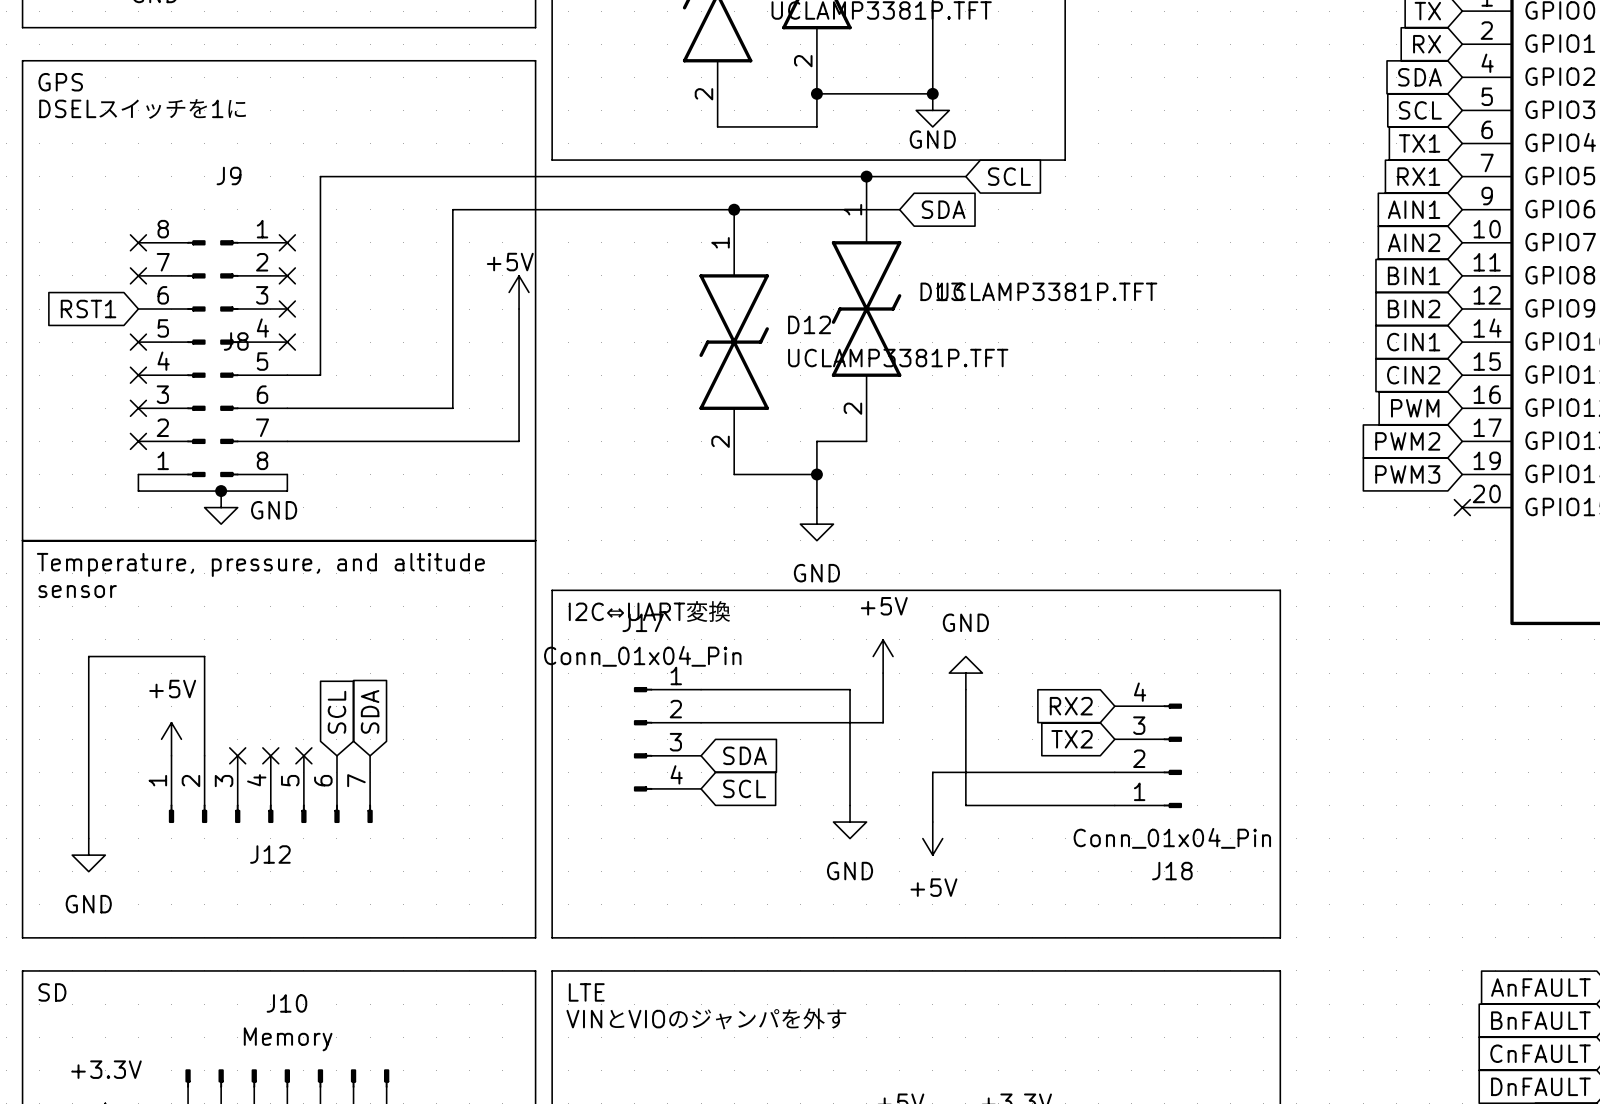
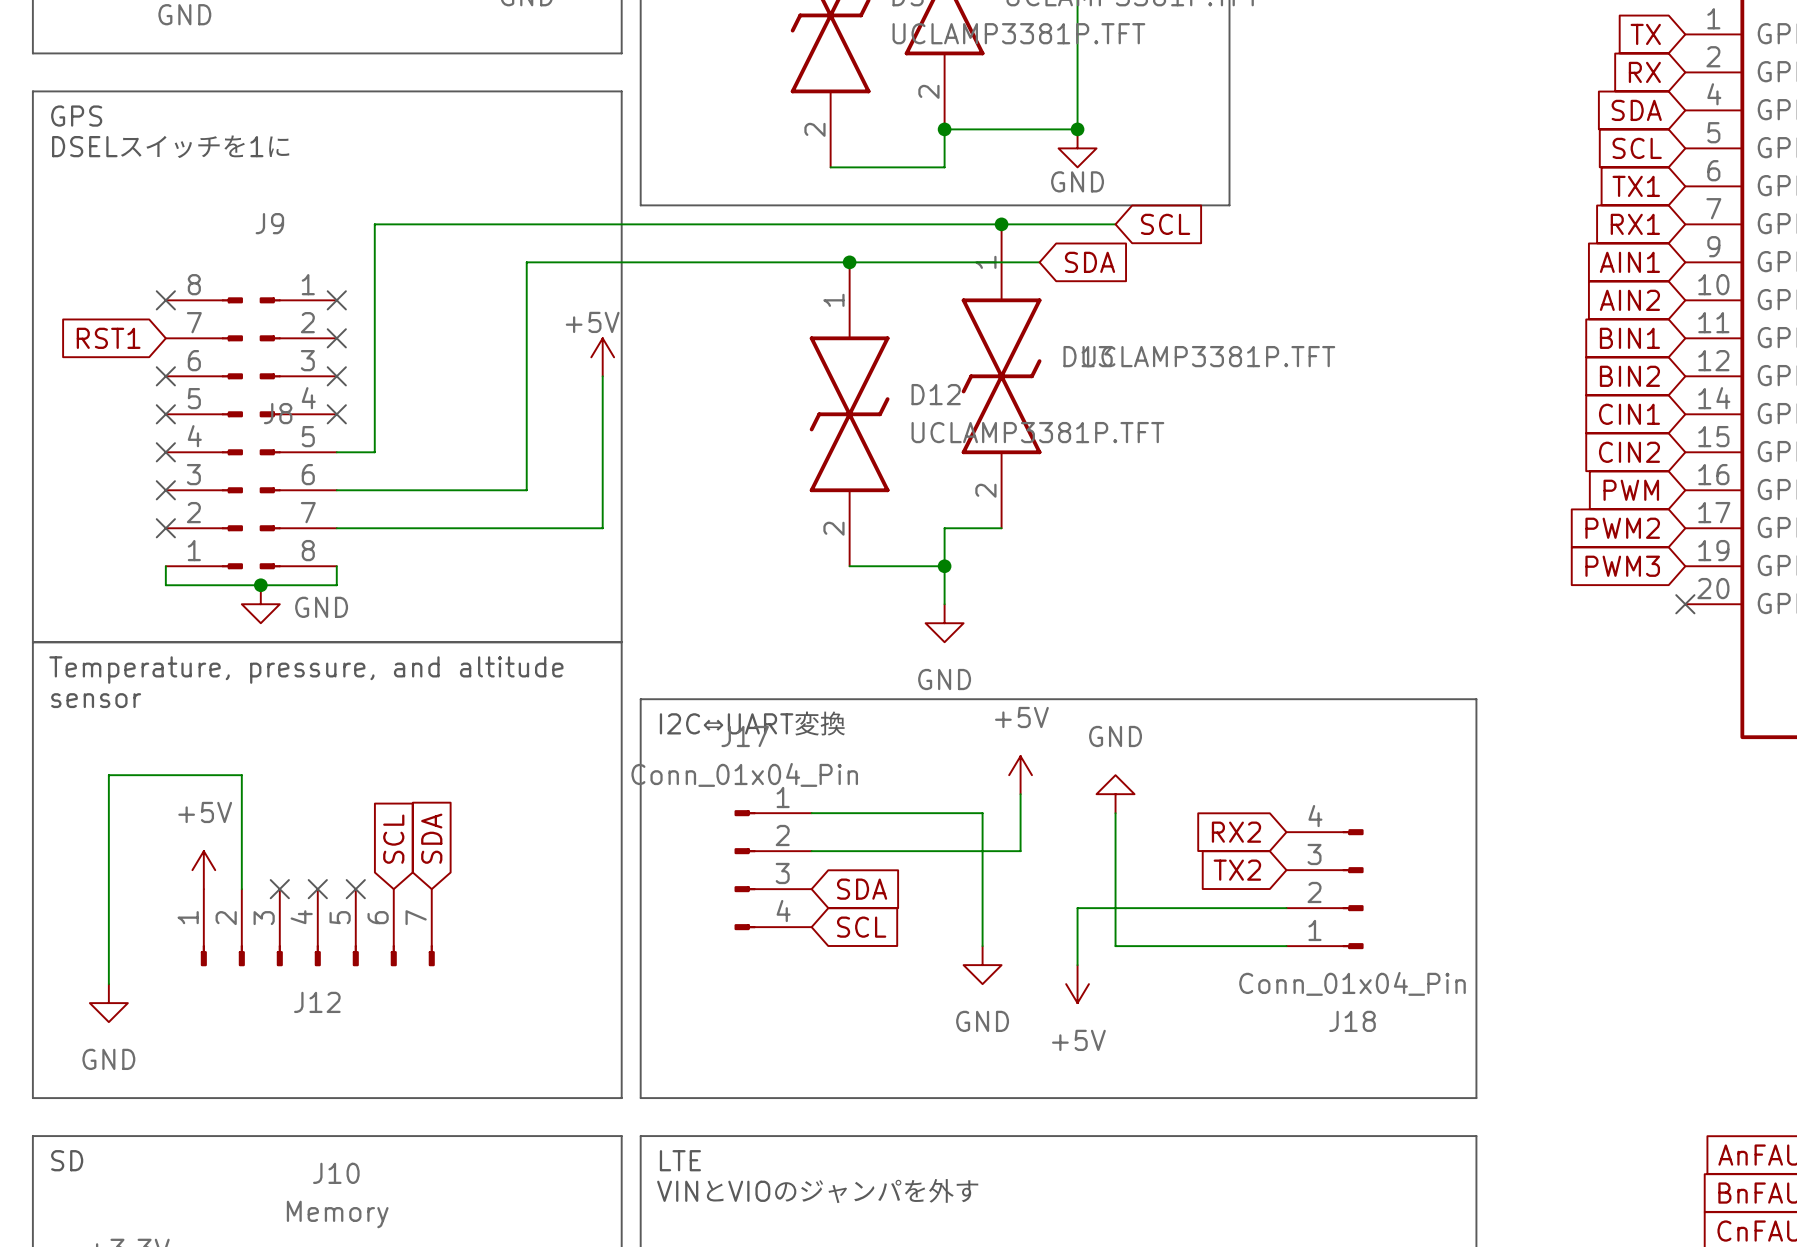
no-connect mark position: (138, 275) -> (165, 376)
global label position: RST1 (88, 309) -> RST1 (108, 338)

